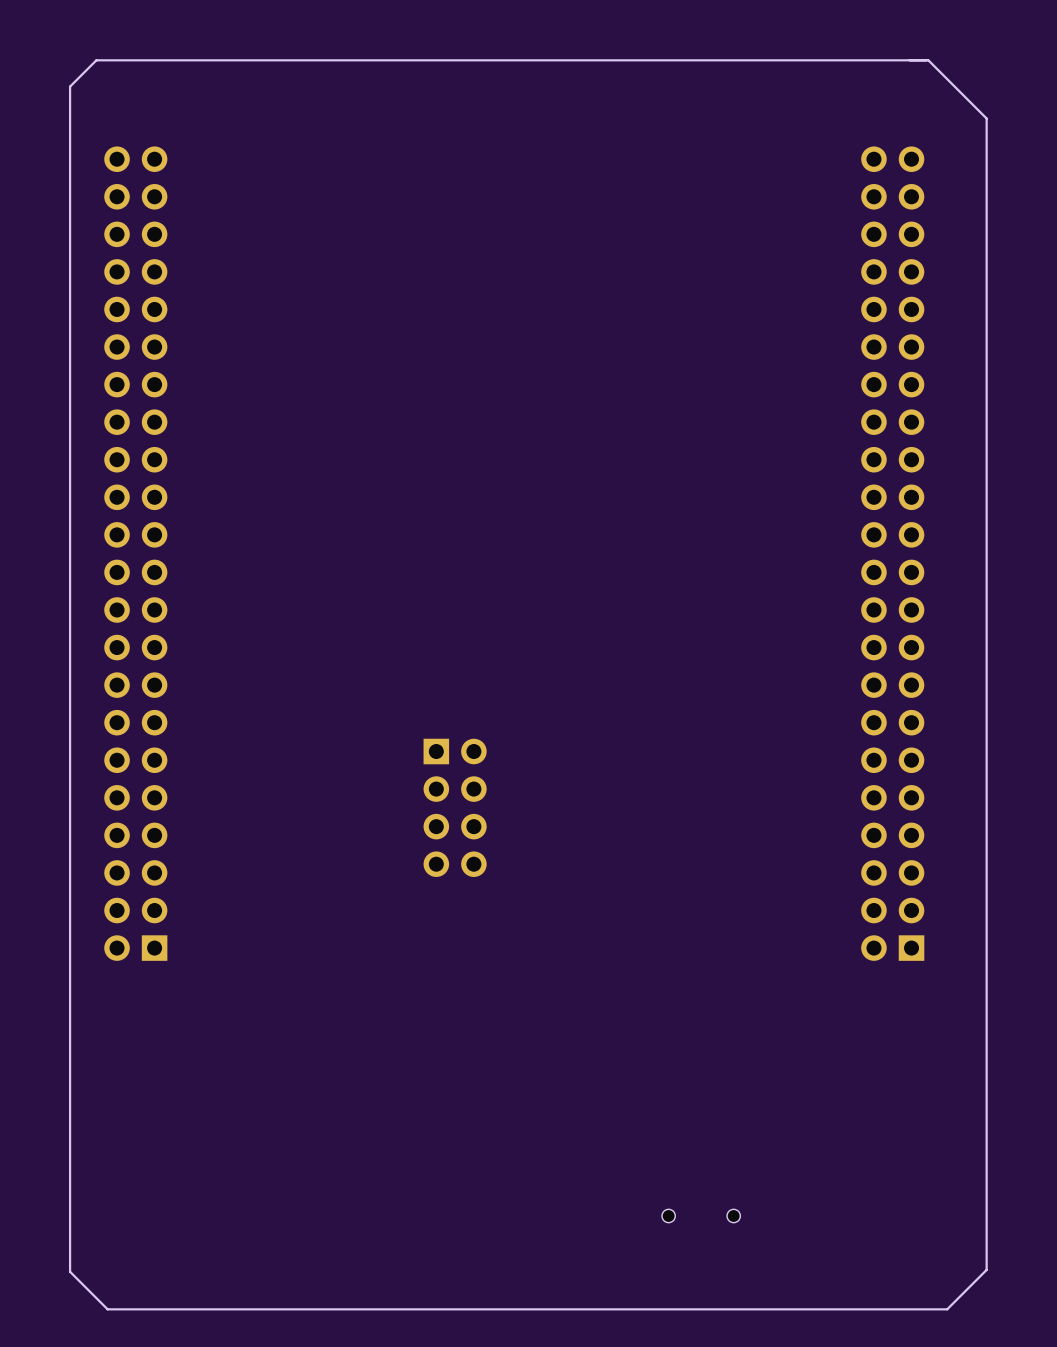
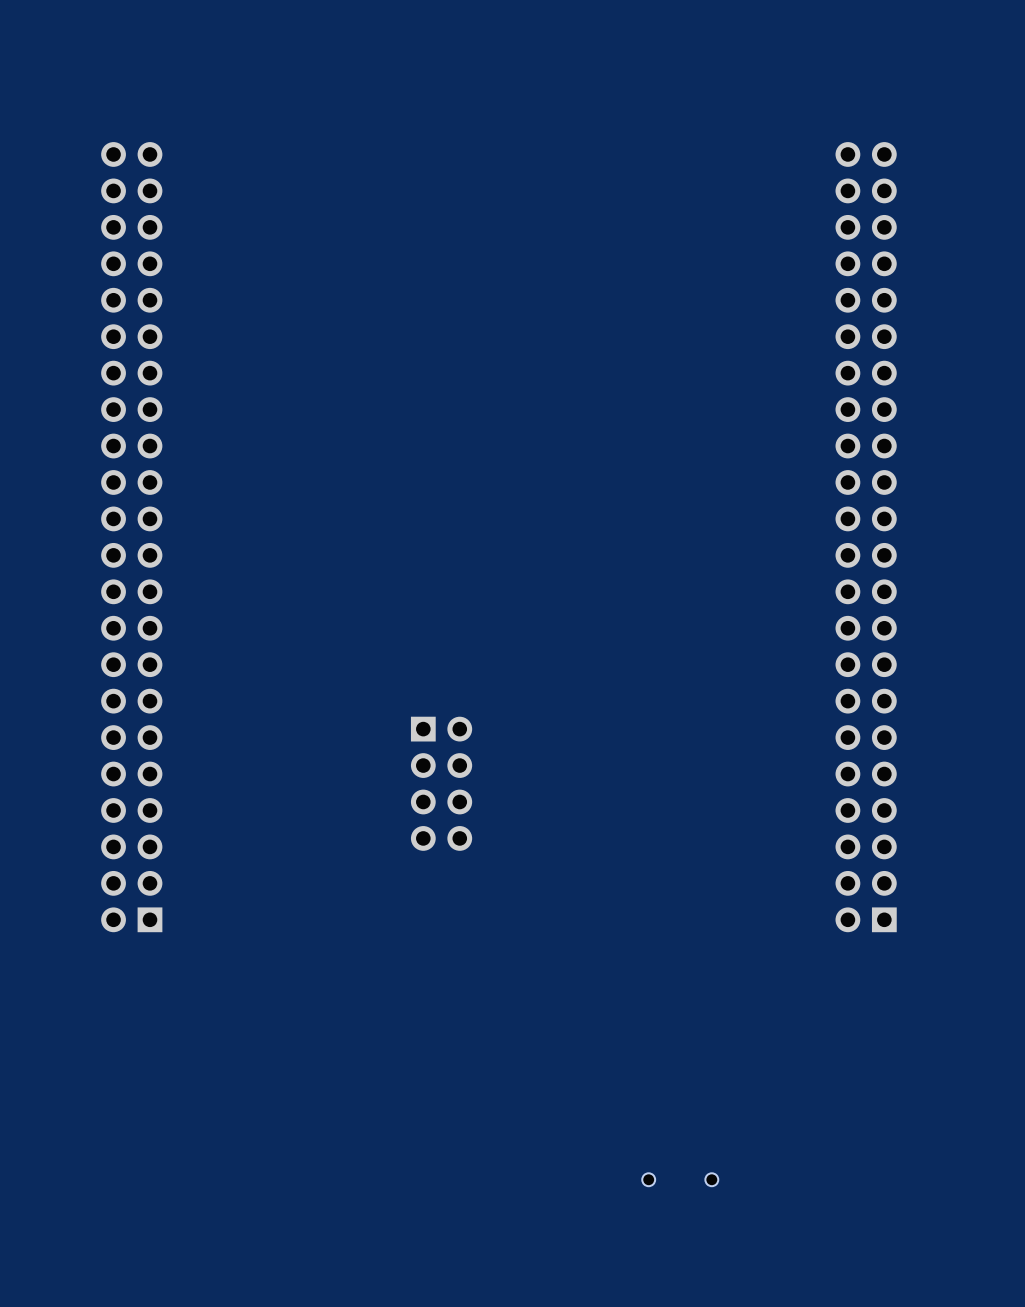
board edge: (928, 60) (96, 60) (70, 86) (70, 1271) (107, 1309) (947, 1309) (986, 1269) (986, 118) (928, 60) -> none

